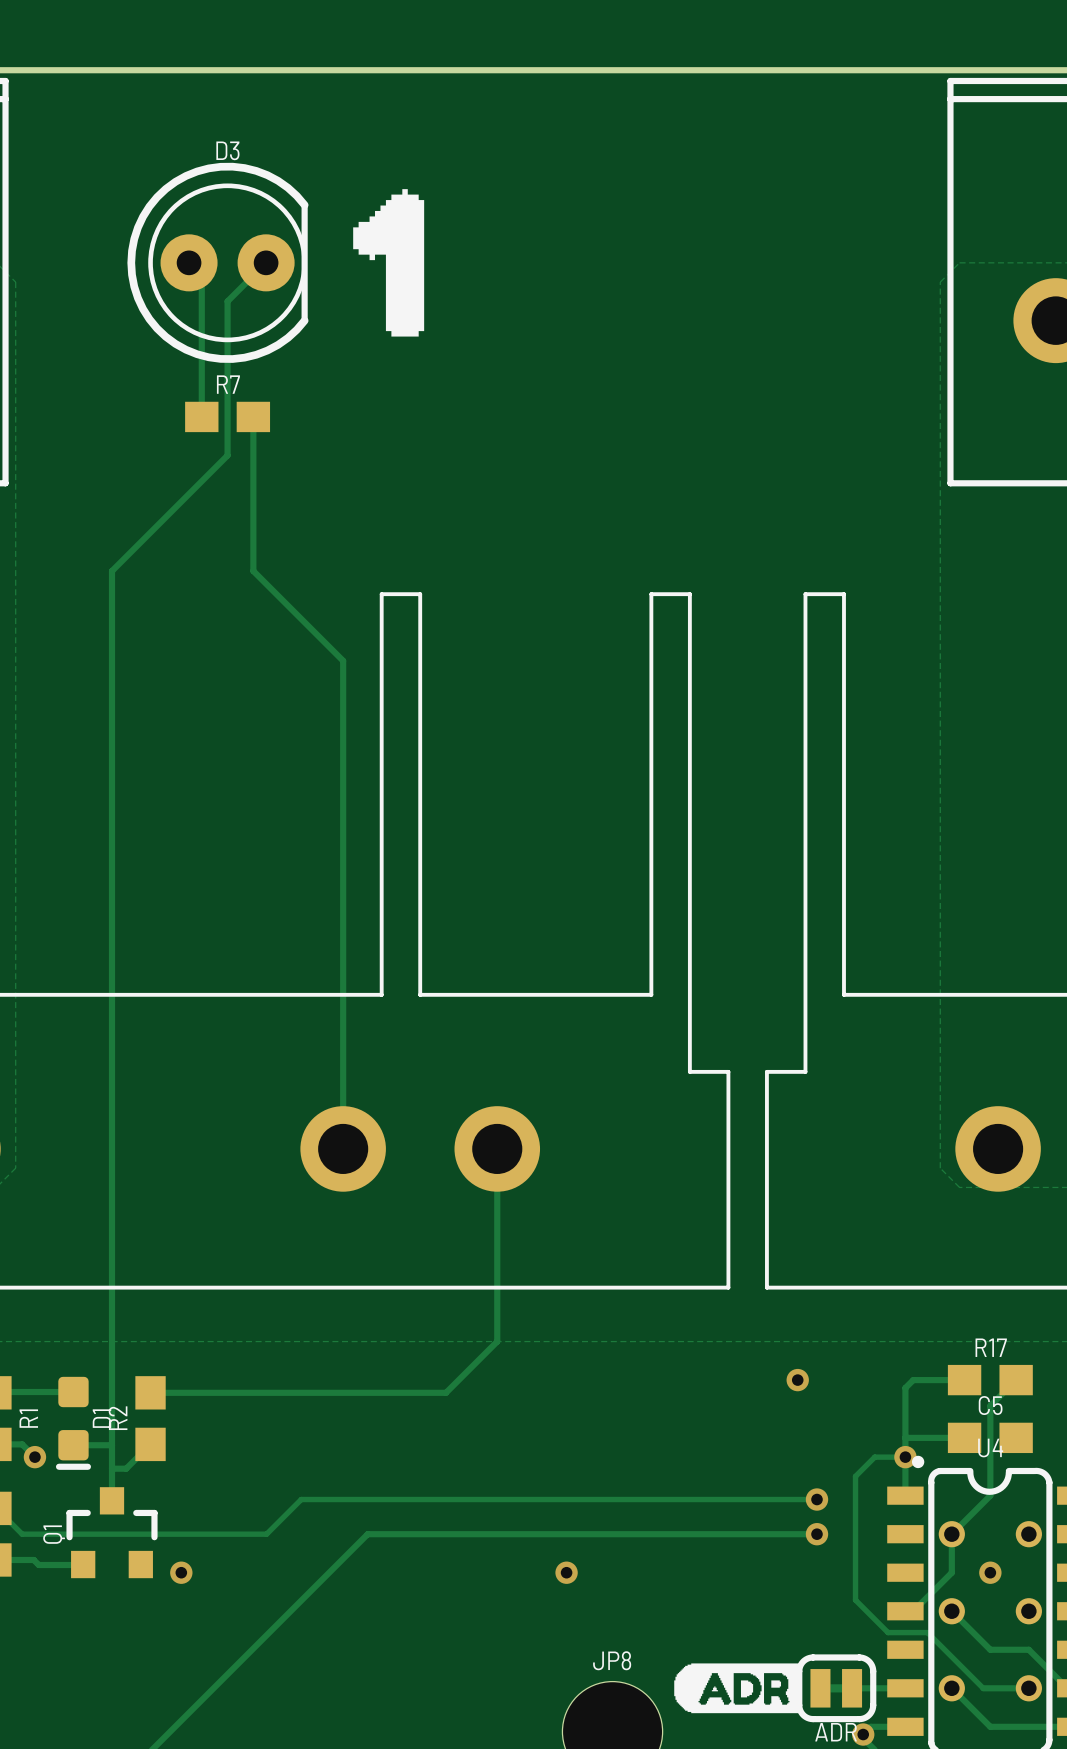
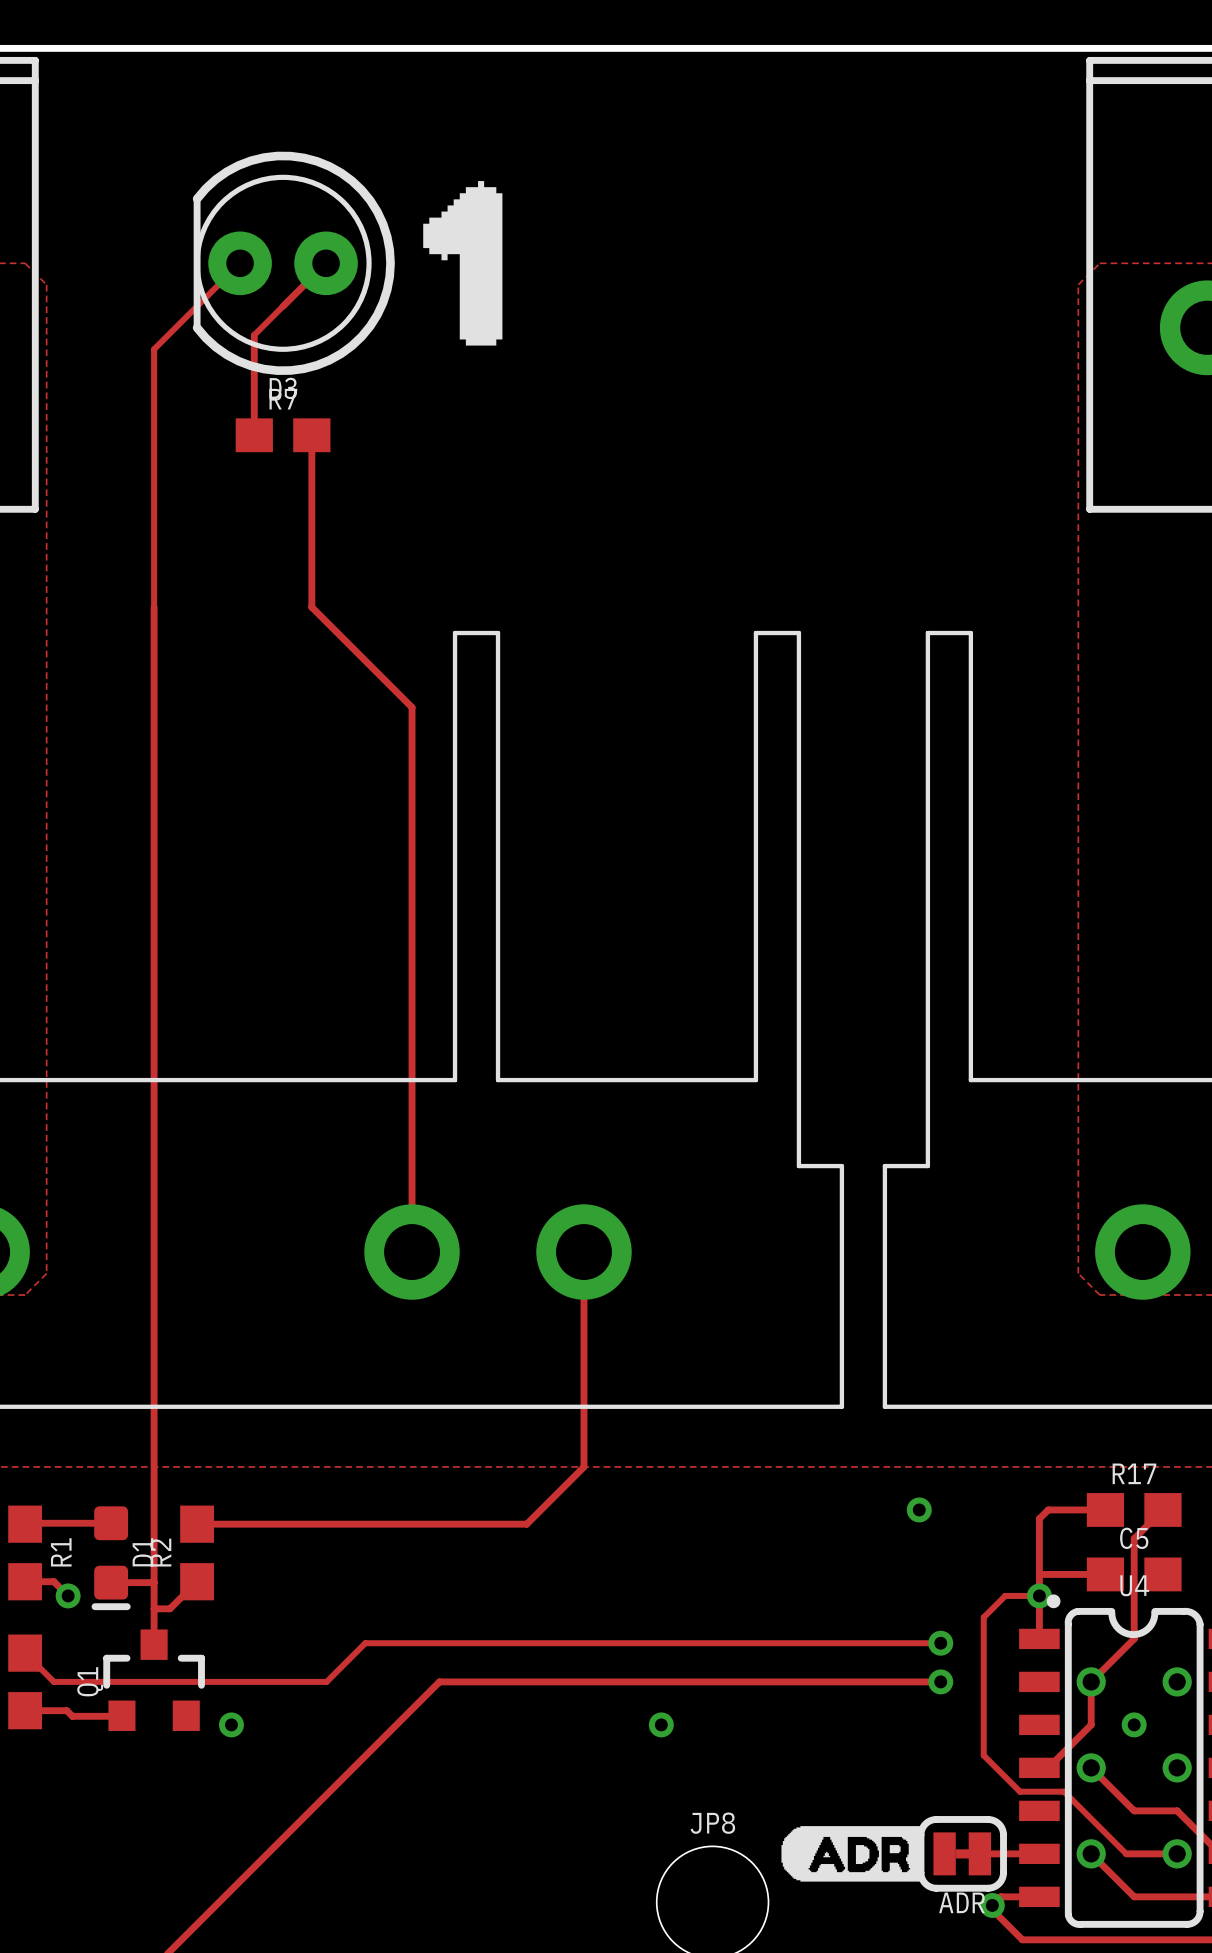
track: (189, 262) (201, 275) (201, 327) -> (283, 306) (254, 335)
D3 rotation: 0° (217, 262) -> 180° (293, 263)
track: (227, 301) (227, 455) (112, 571) -> (240, 263) (154, 349) (154, 607)

